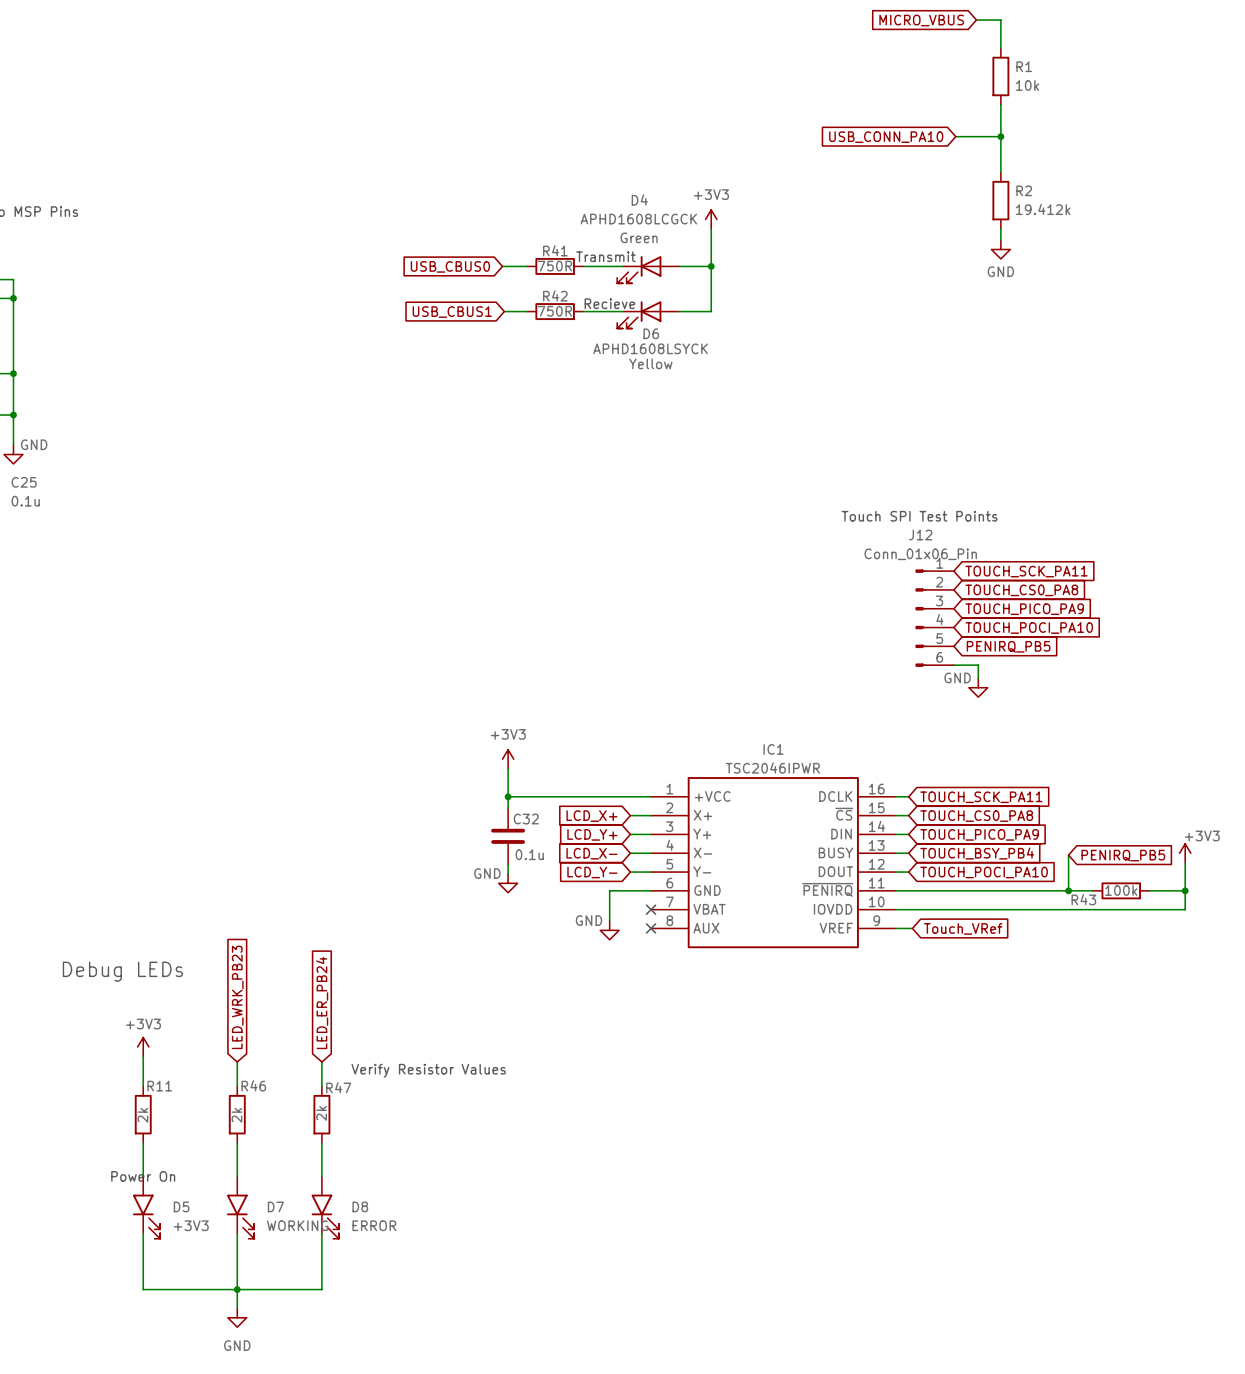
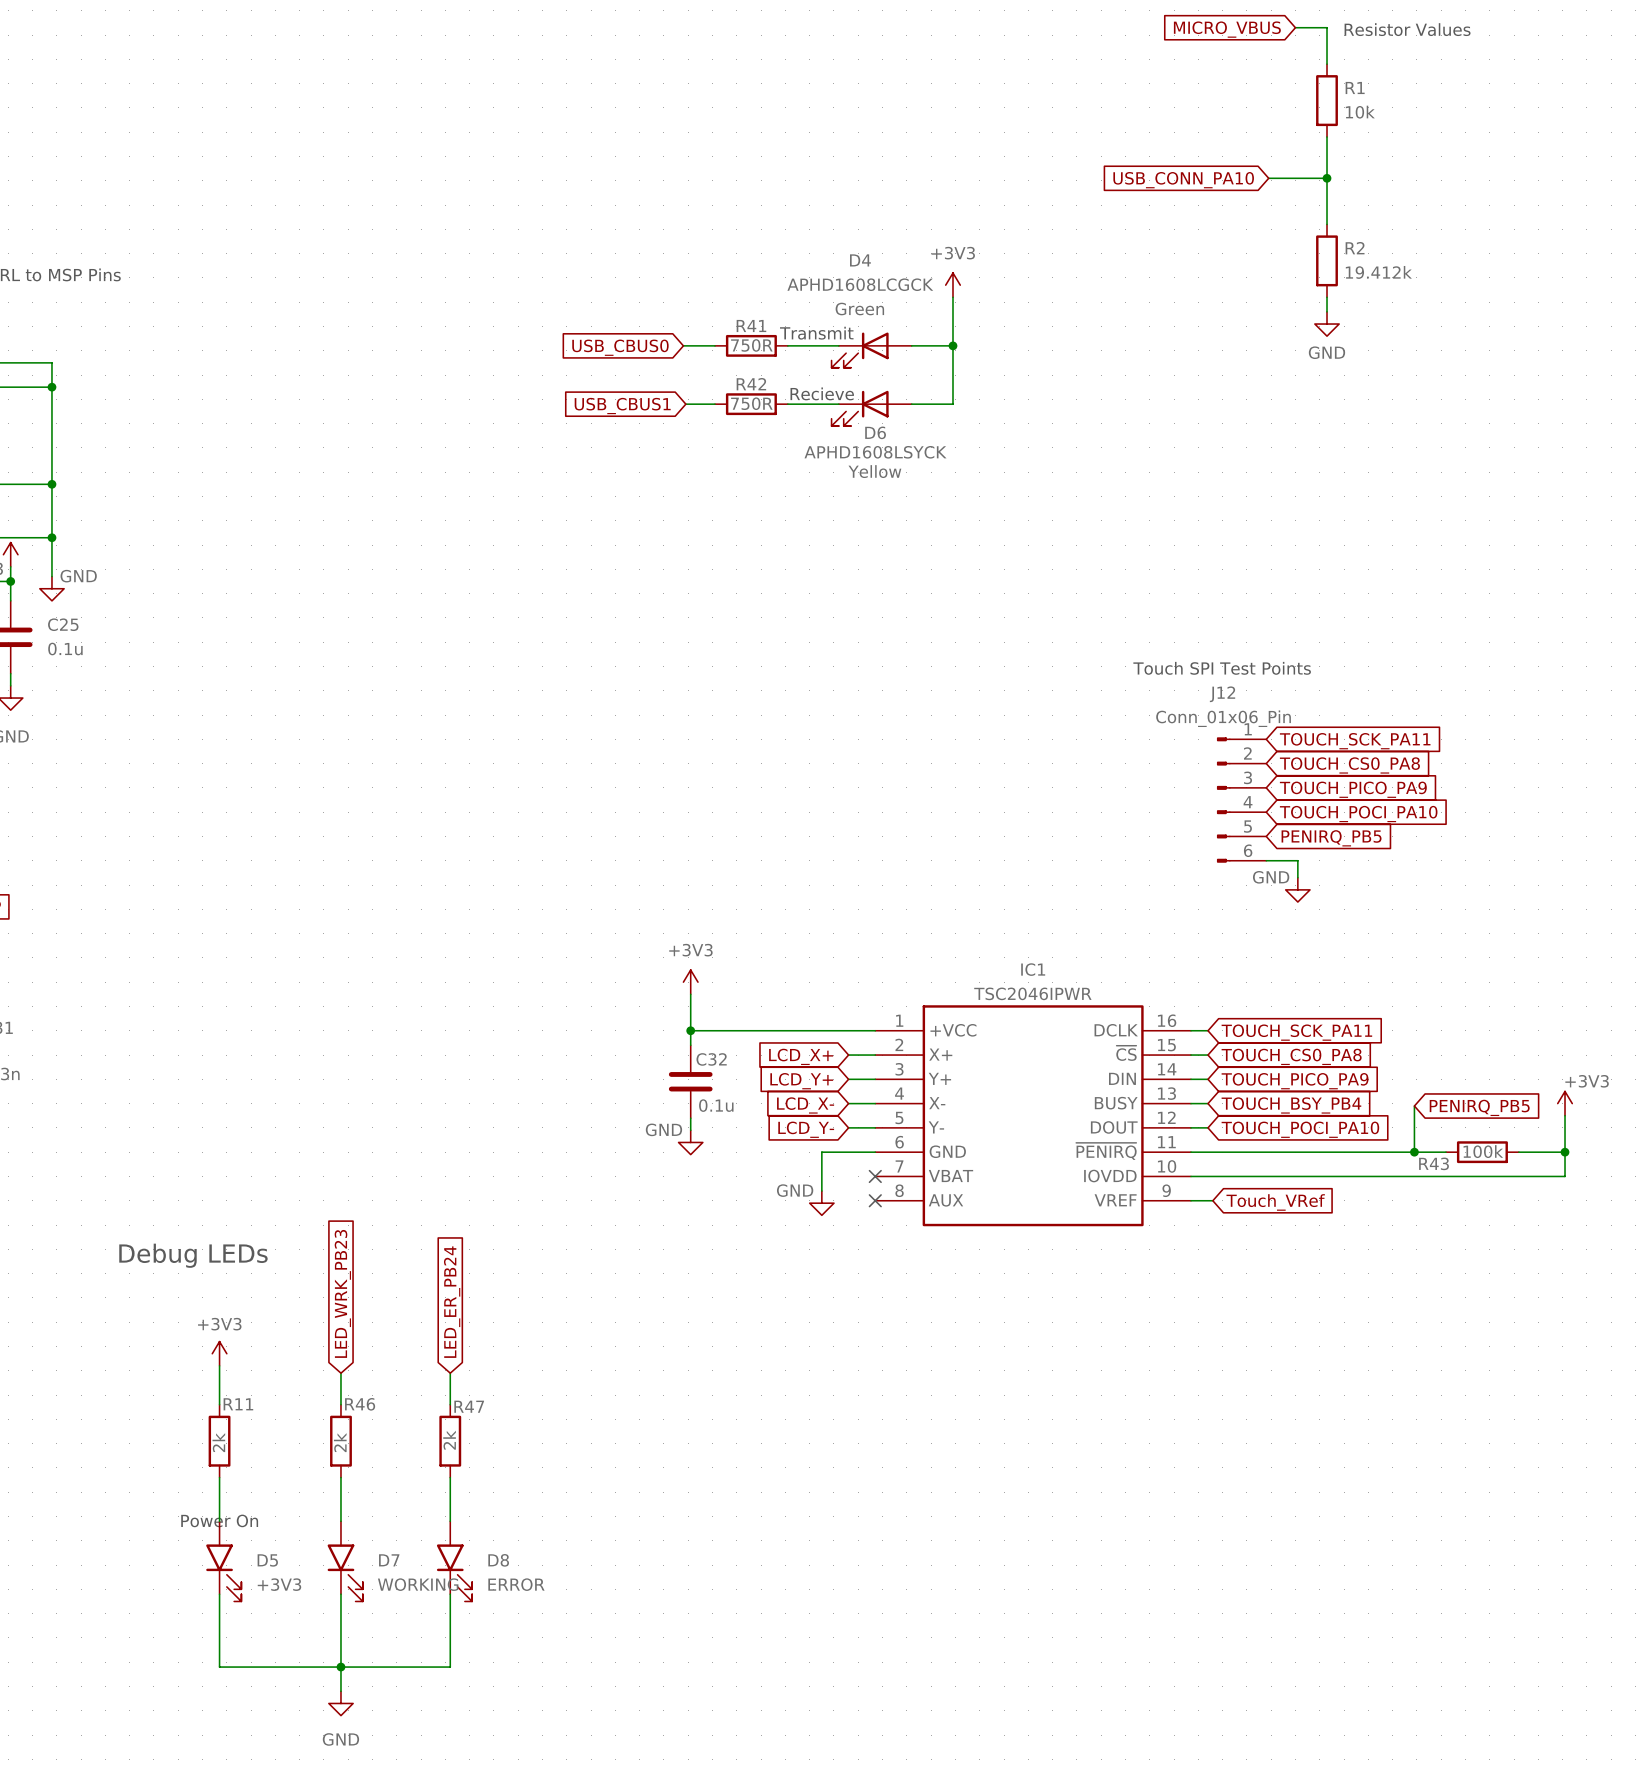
text: none -> Resistor Values (1407, 29)
text: Verify Resistor Values (428, 1070) -> none

